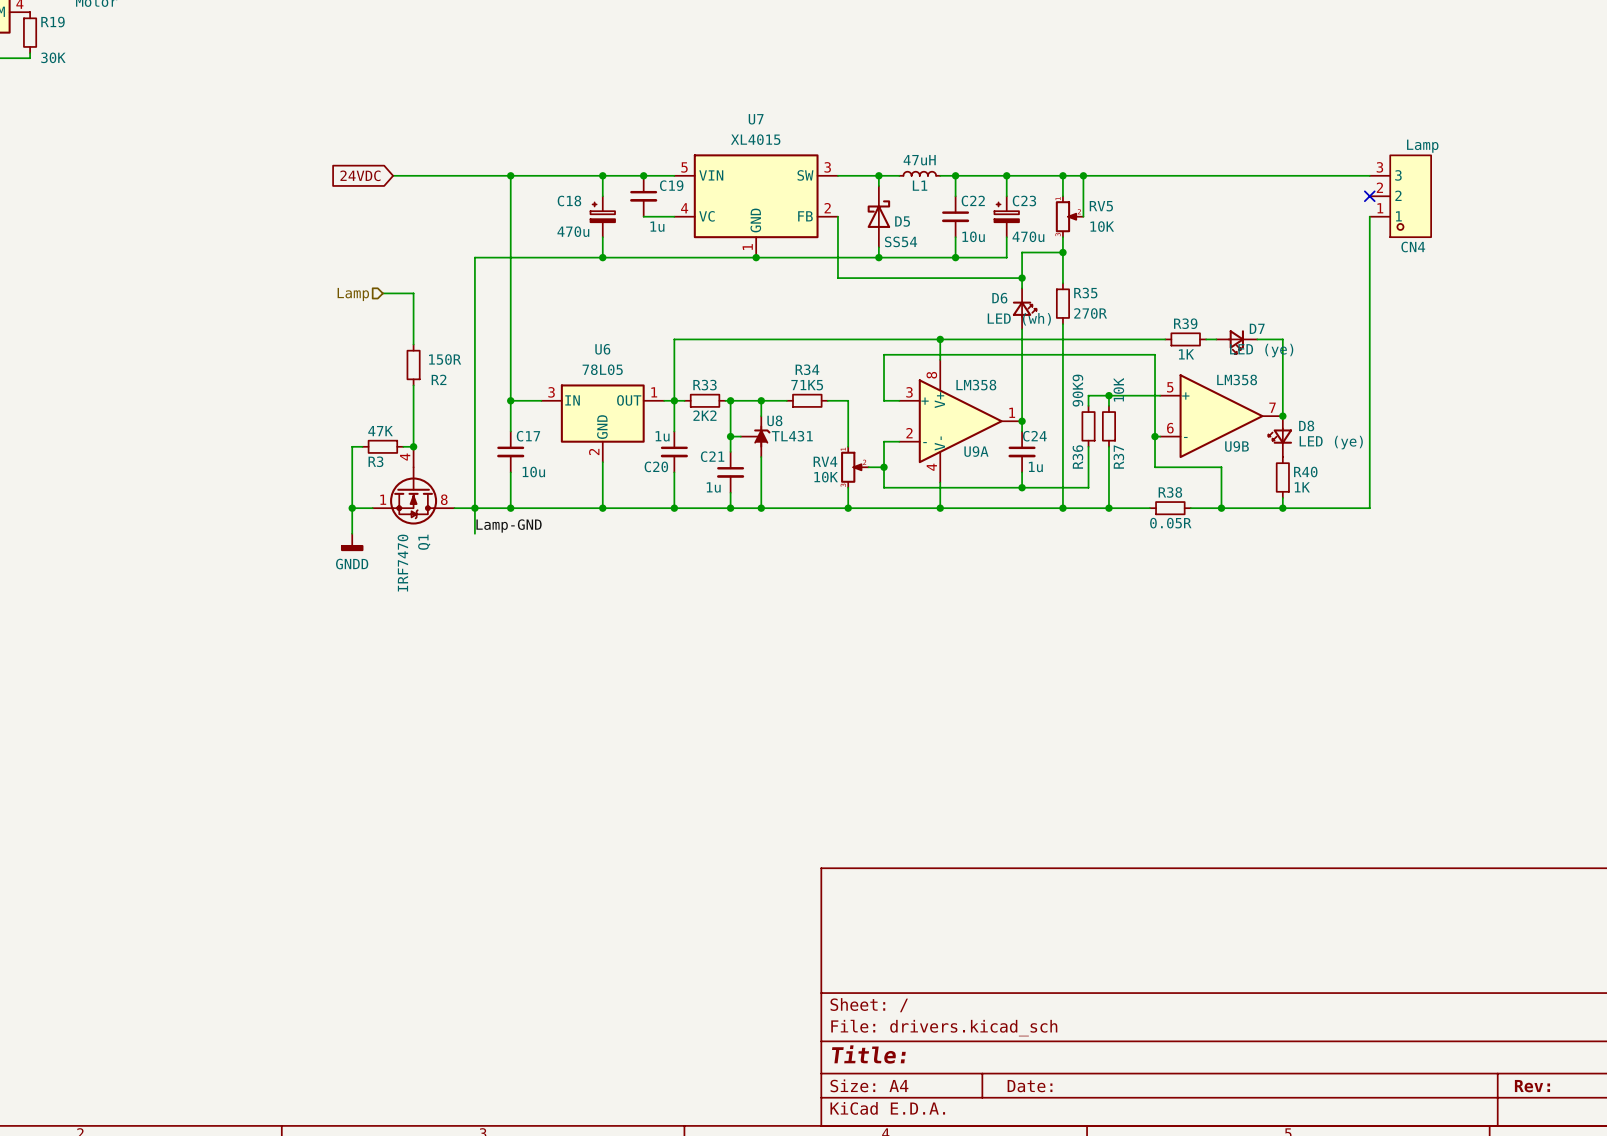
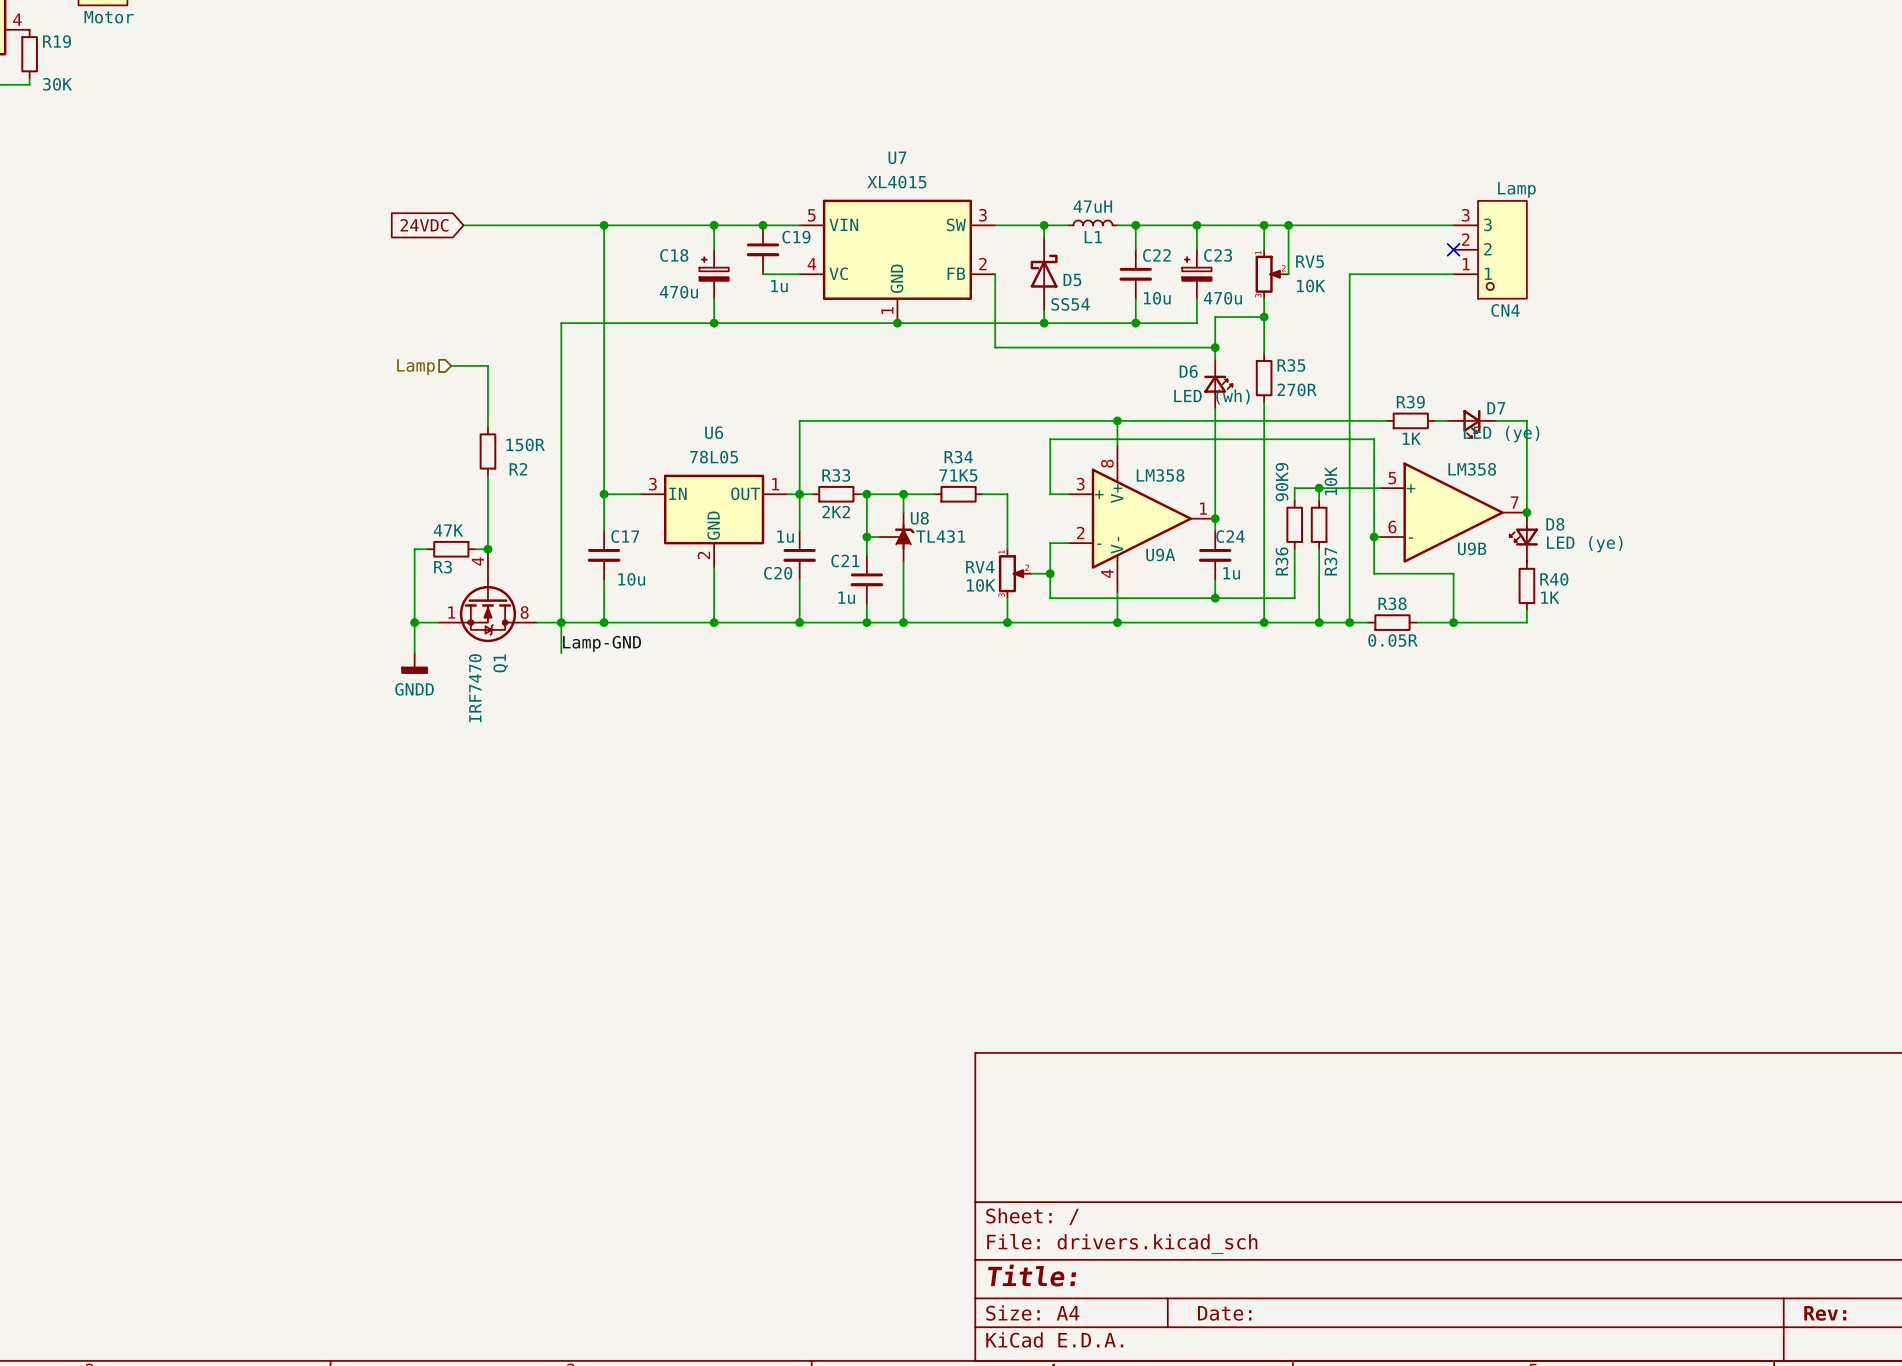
wire: (1221, 175) (1369, 175) -> none
no-connect mark: none -> (1453, 249)
no-connect mark: (1369, 196) -> none
CN4 position: (1400, 196) -> (1490, 249)
wire: none -> (1453, 274) (1349, 274) (1349, 622)
wire: (1369, 216) (1369, 508) (1282, 508) -> none
junction: none -> (1349, 622)
junction: (1282, 508) -> none

